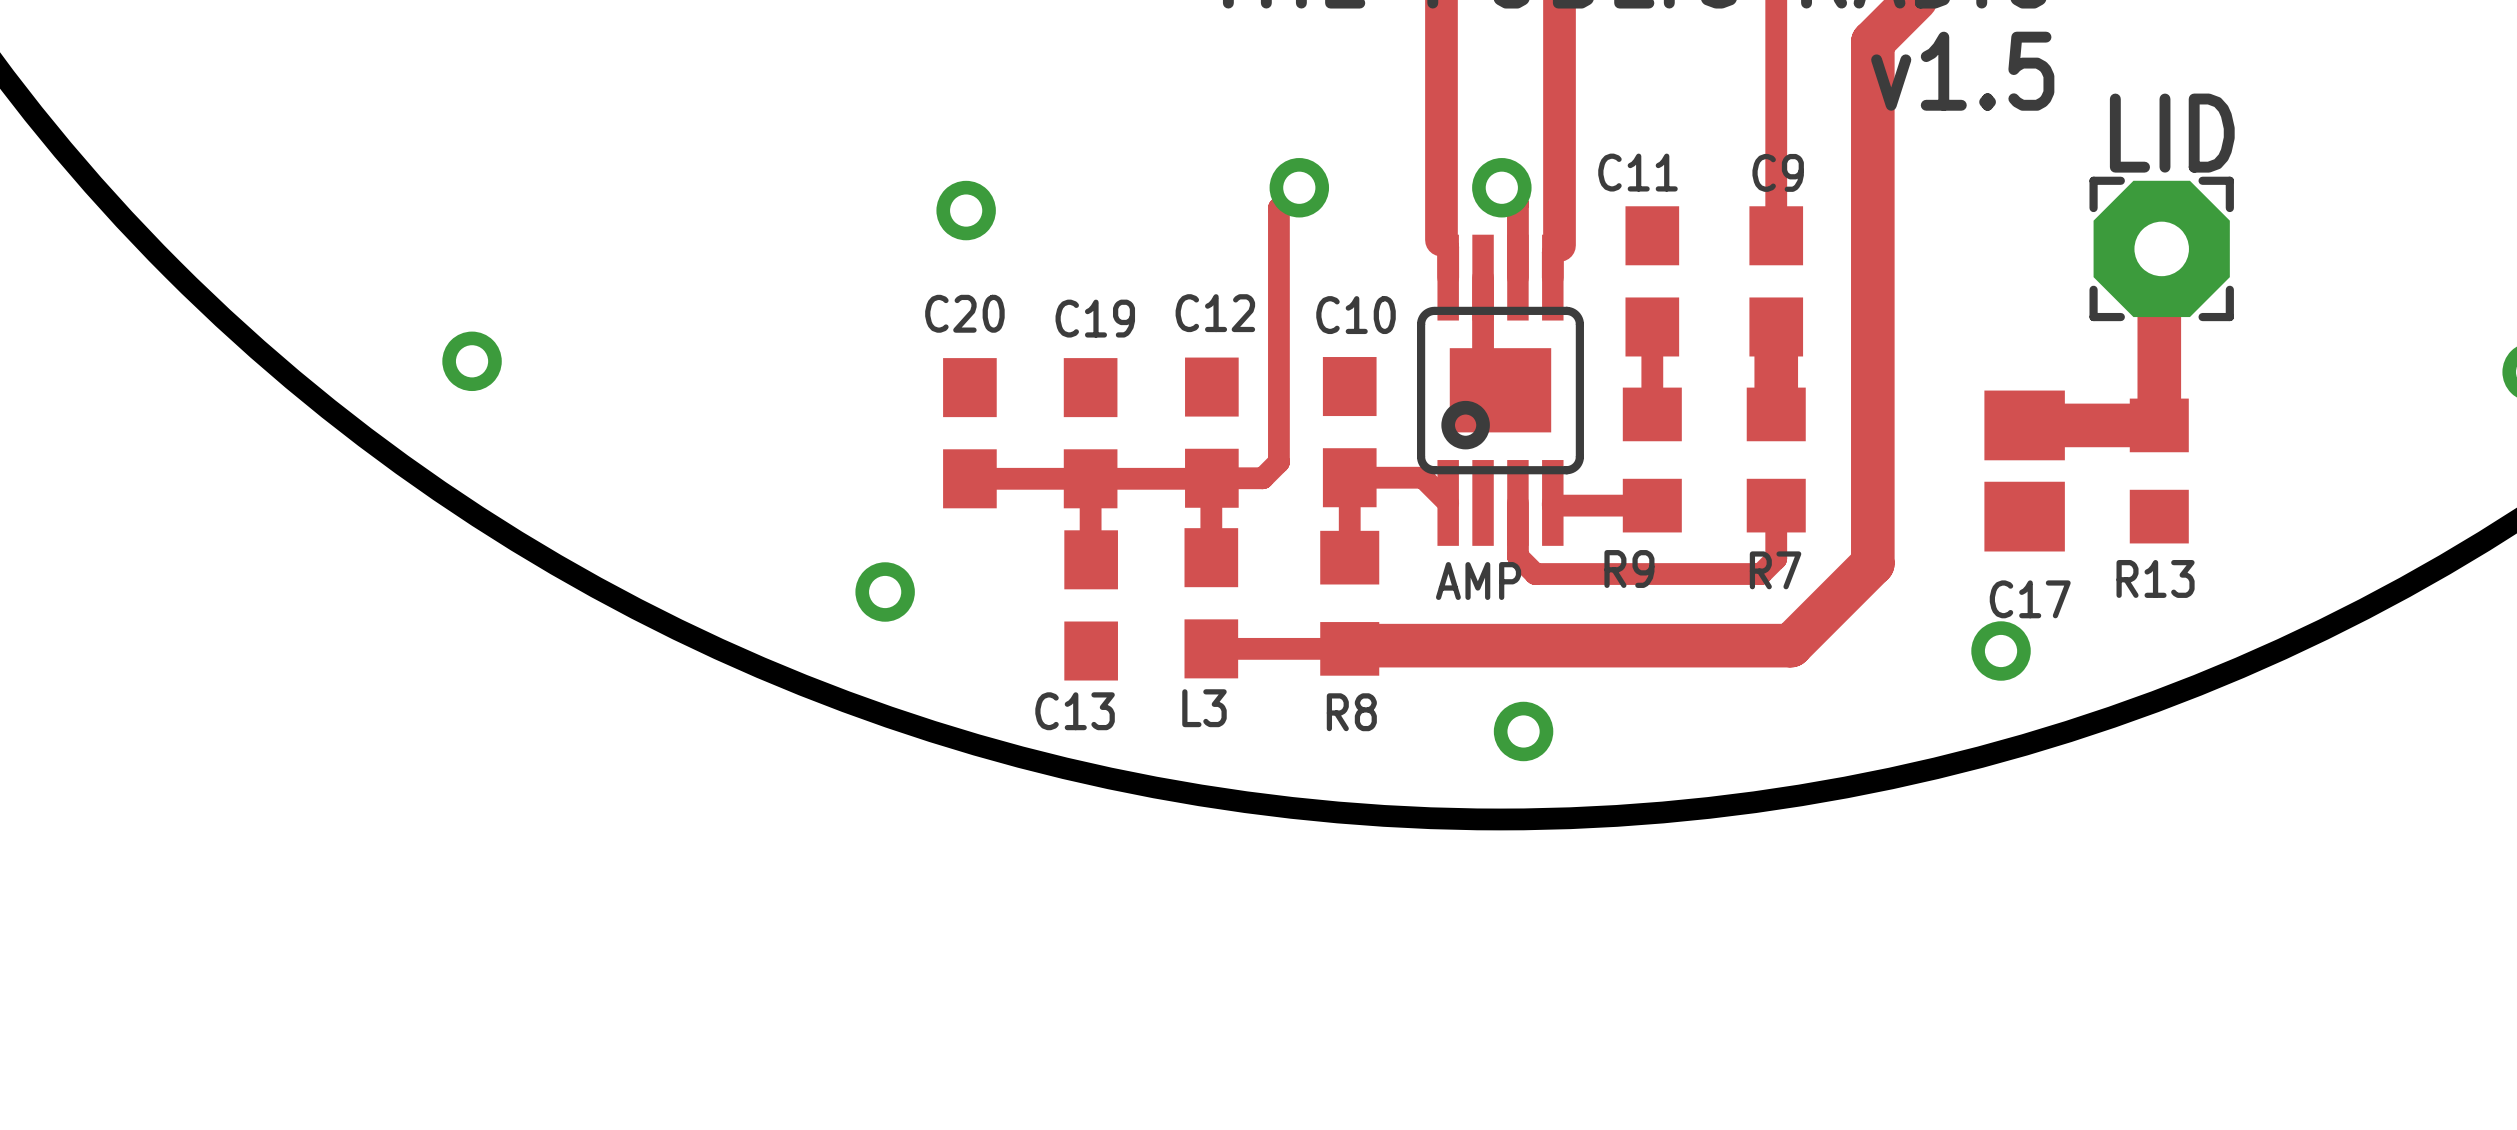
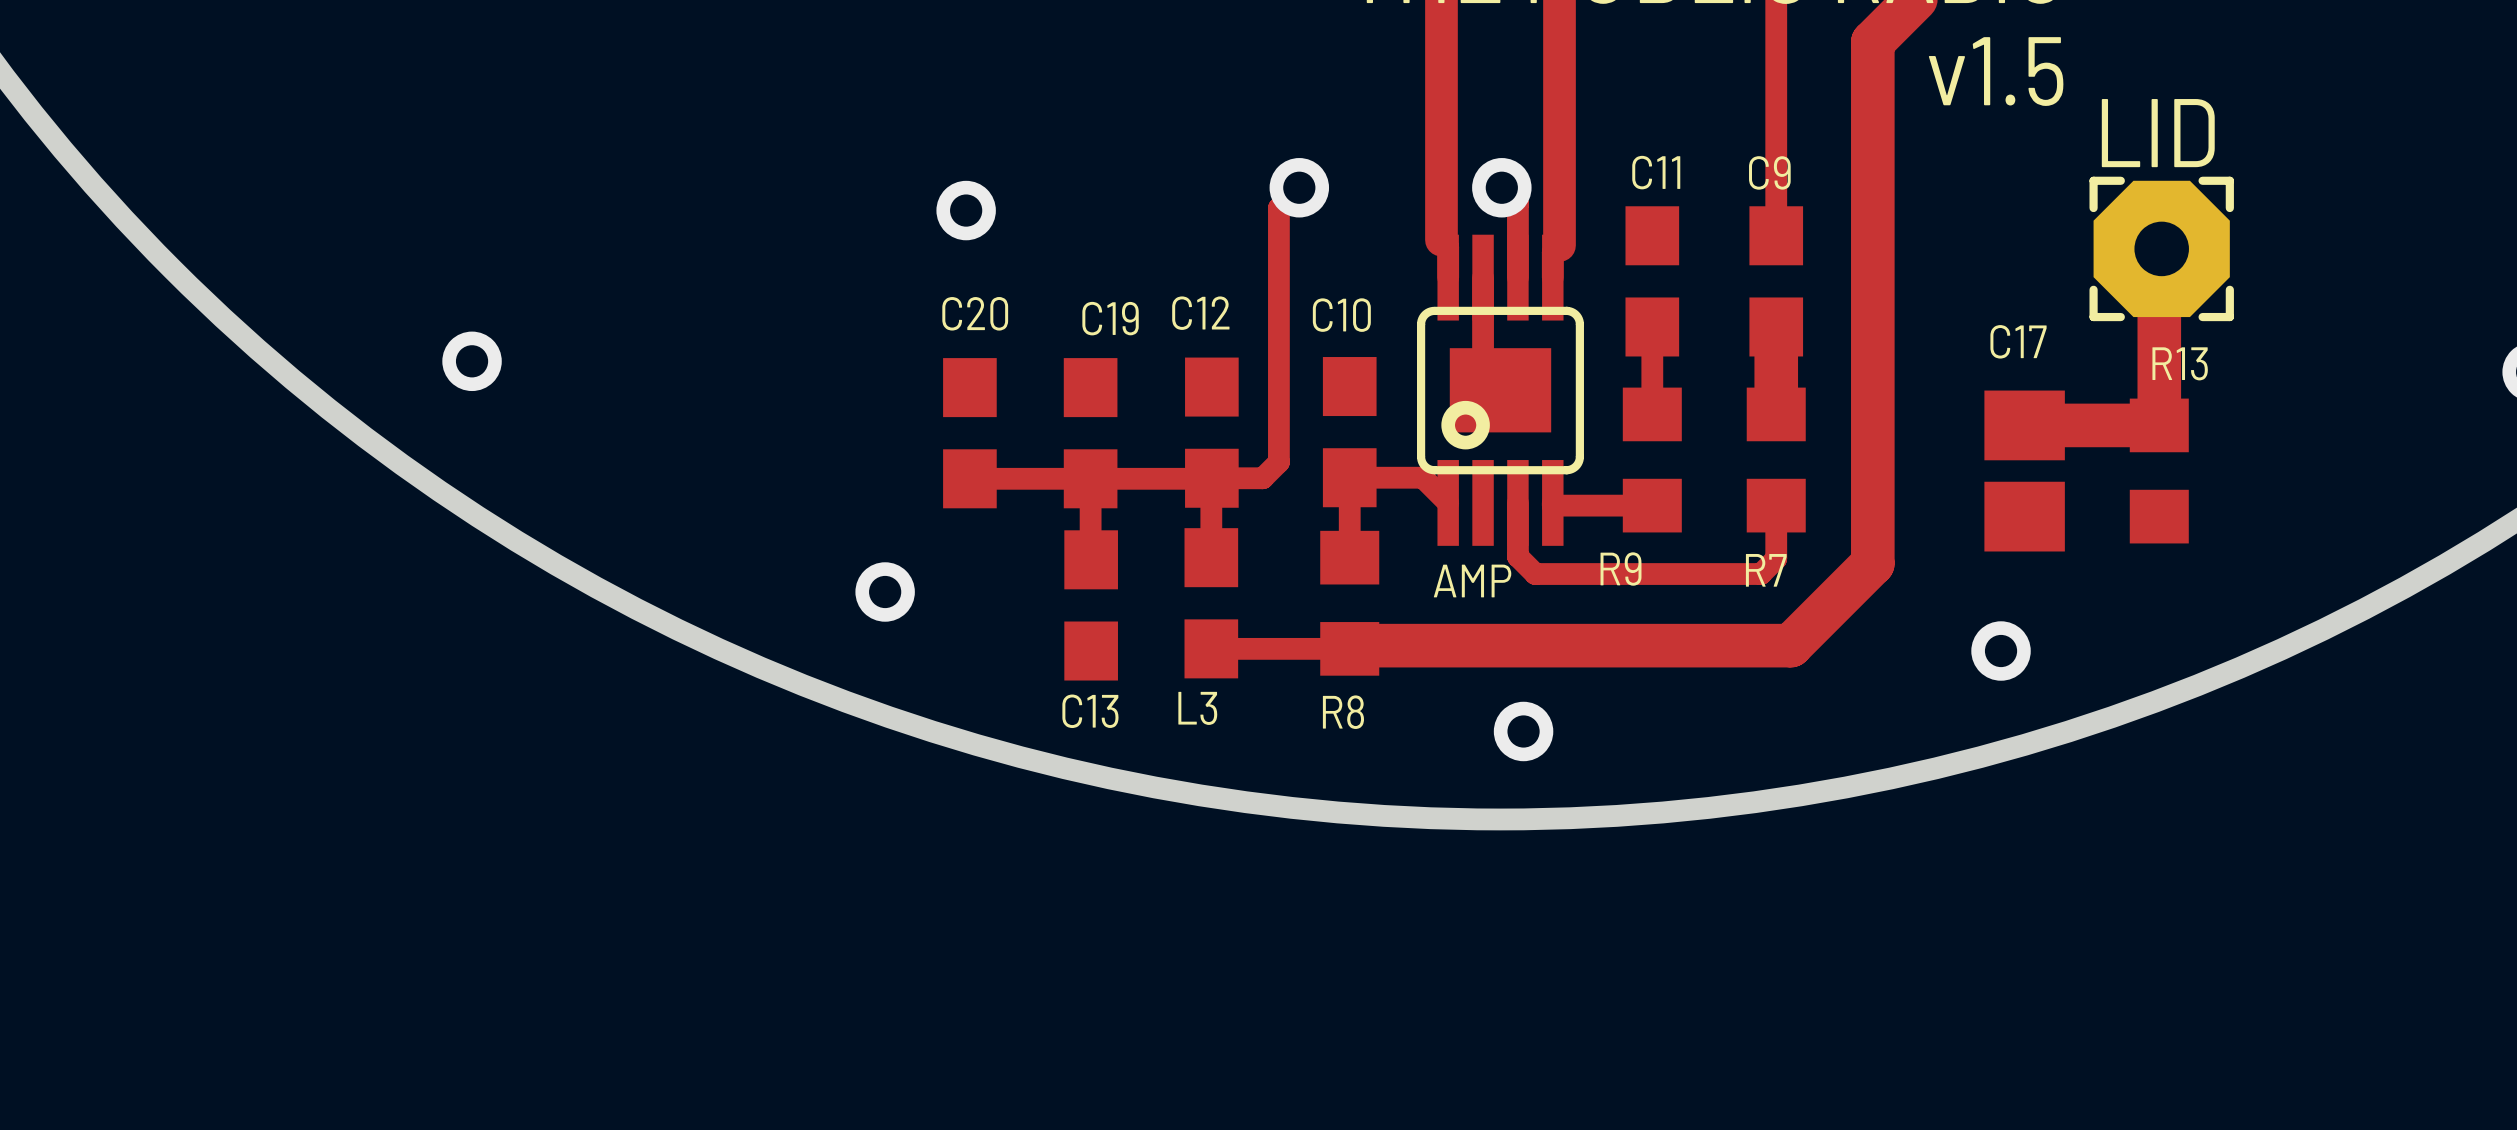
R13 name position: R13 (2155, 578) -> R13 (2180, 363)
C17 name position: C17 (2030, 599) -> C17 (2018, 341)

